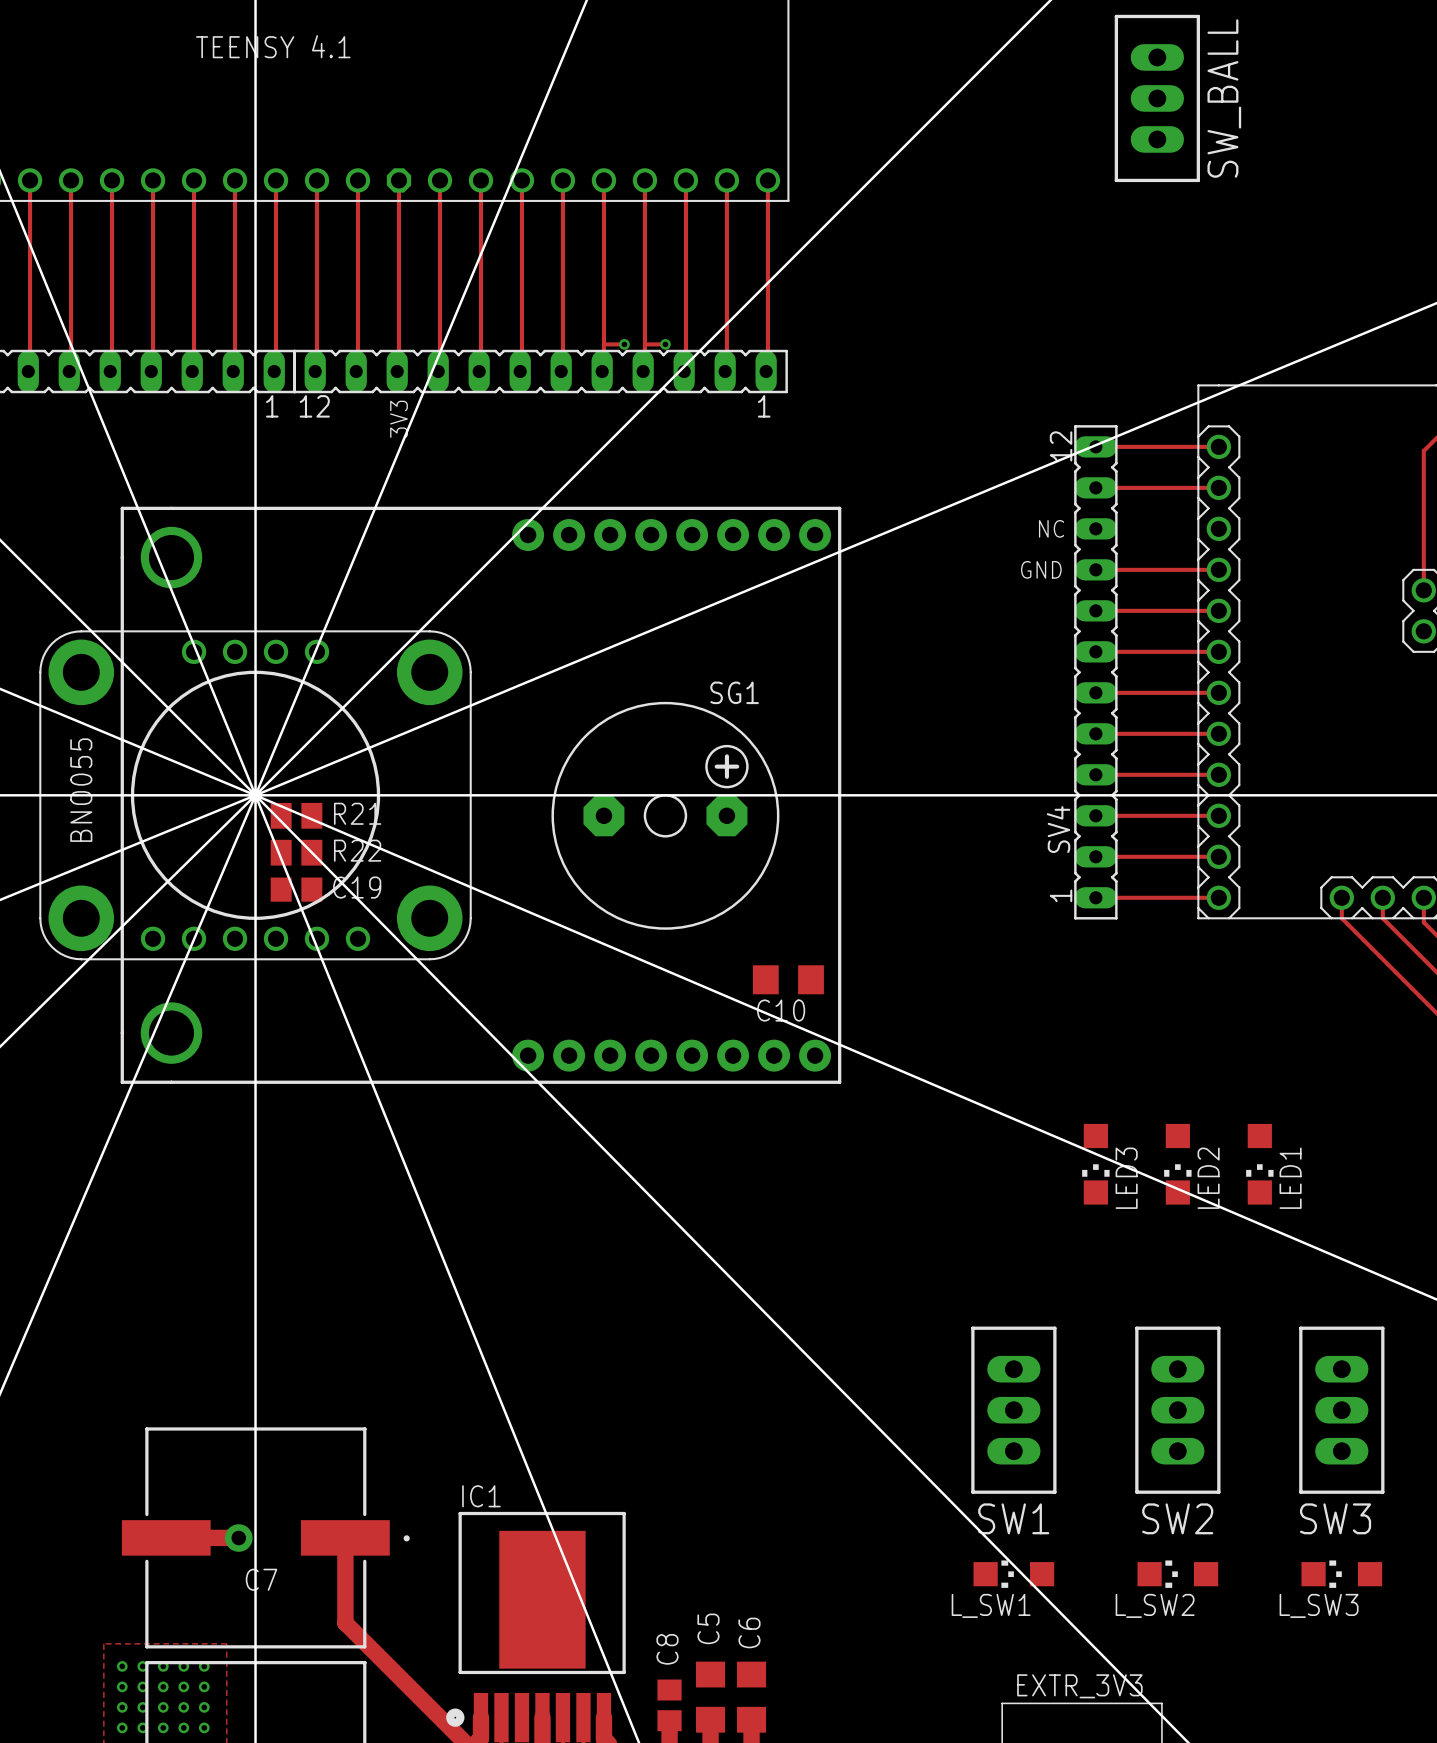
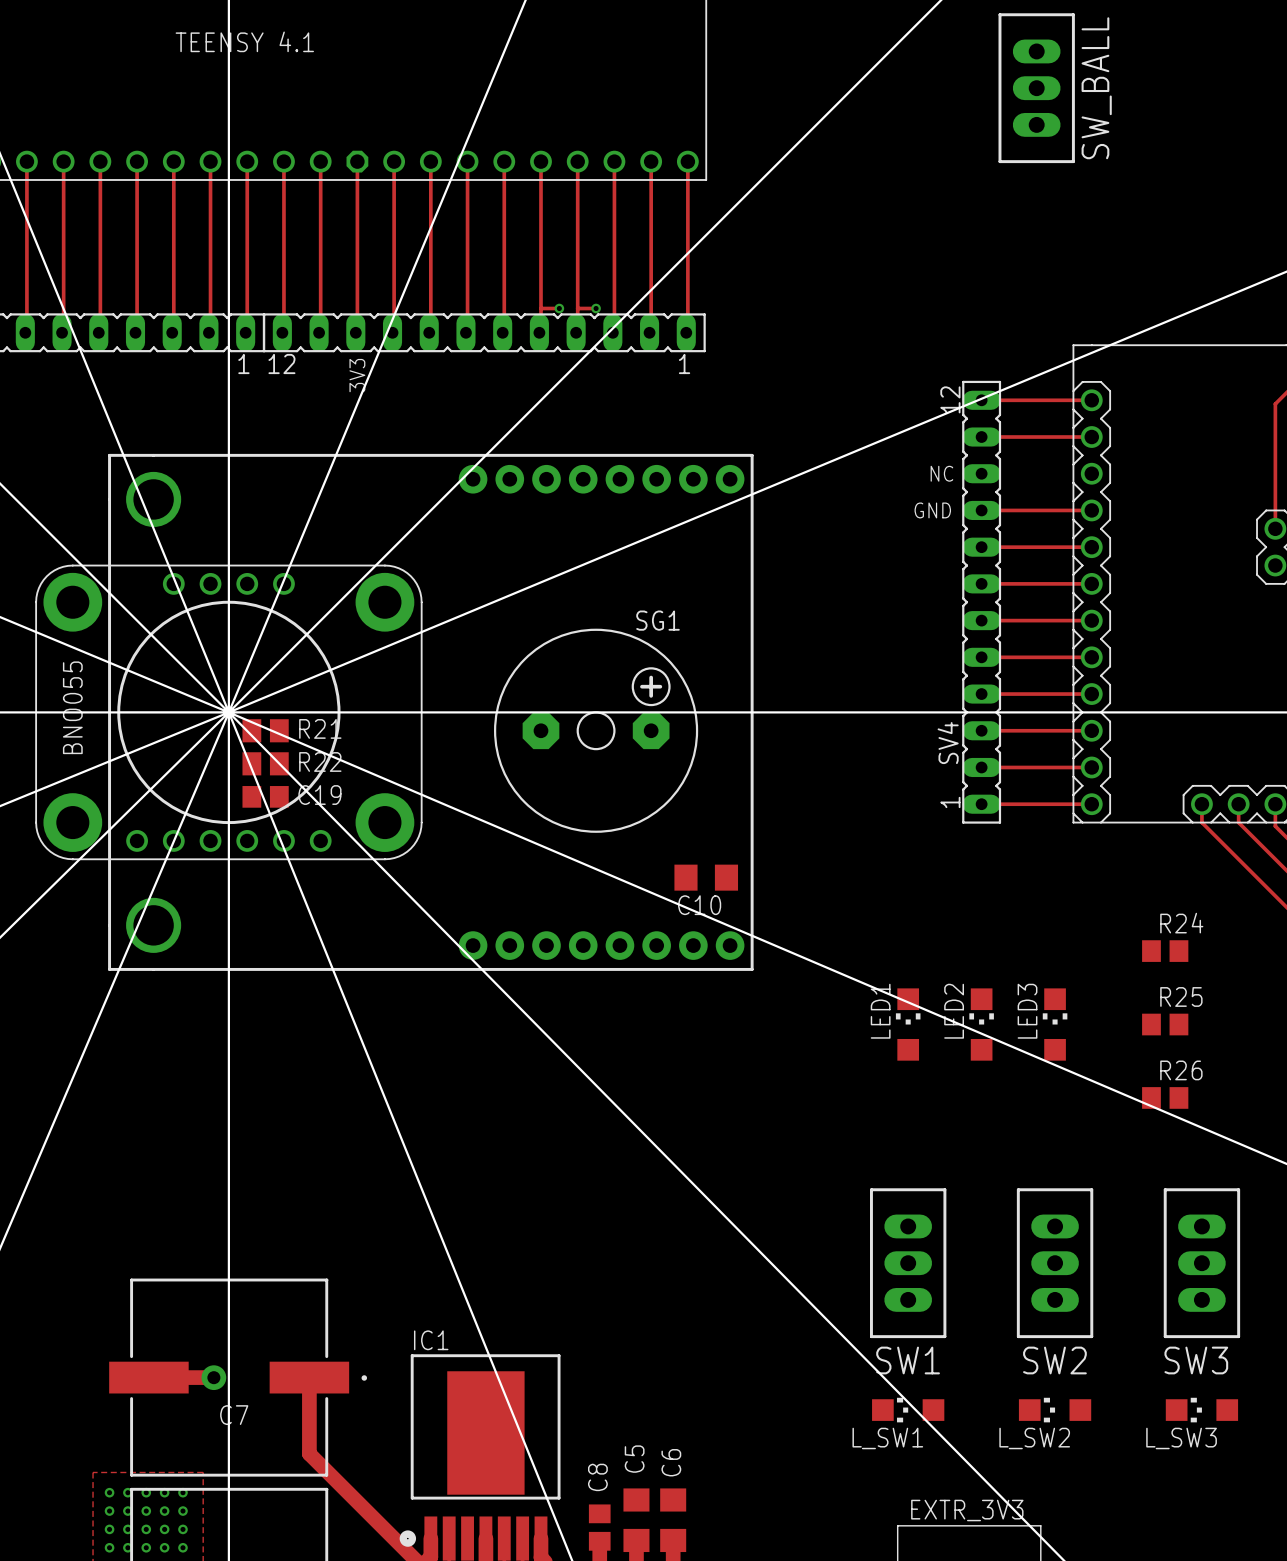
R24: none -> (1165, 951)
R25: none -> (1165, 1024)
LED3 rotation: 0° (1095, 1164) -> 180° (1055, 1024)
LED3 position: (1095, 1164) -> (1055, 1024)
LED2 rotation: 0° (1177, 1164) -> 180° (981, 1024)
LED2 position: (1177, 1164) -> (981, 1024)
LED1 rotation: 0° (1259, 1164) -> 180° (908, 1024)
LED1 position: (1259, 1164) -> (908, 1024)
R26: none -> (1165, 1097)

